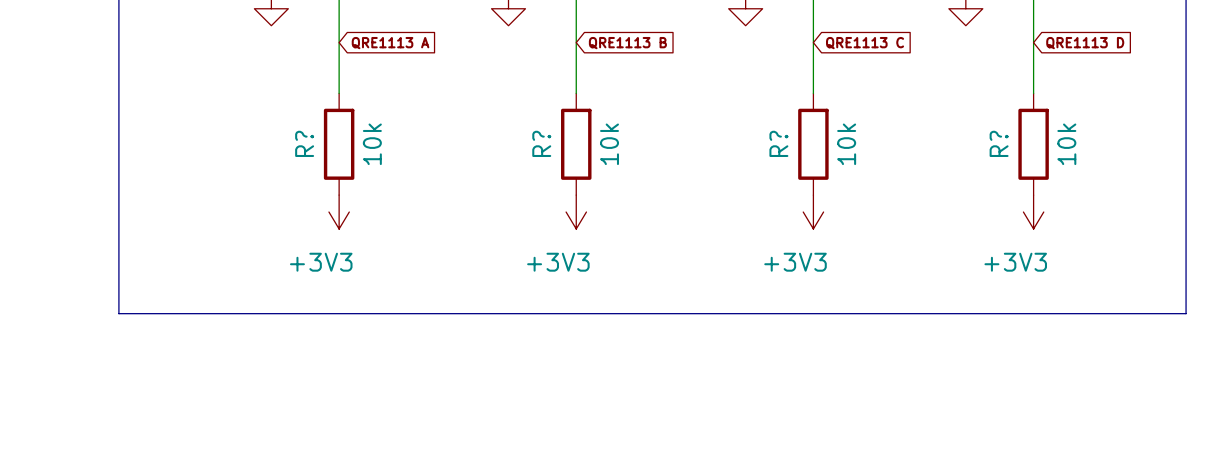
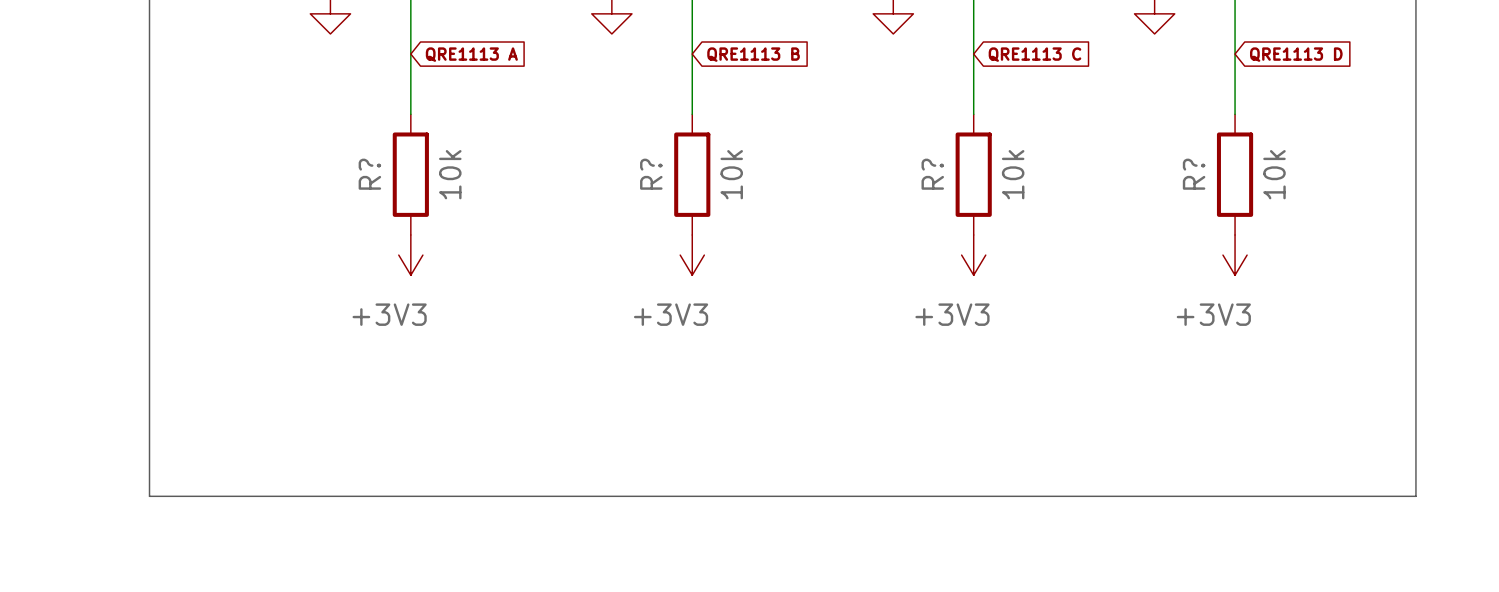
line: (118, 313) (1186, 313) -> (149, 375) (149, 496) (1415, 496) (1415, 375)

